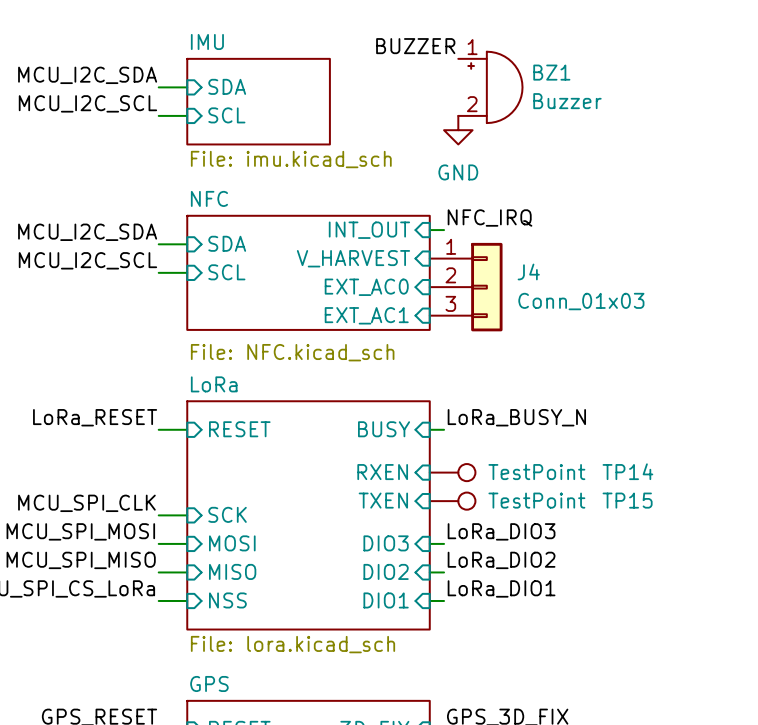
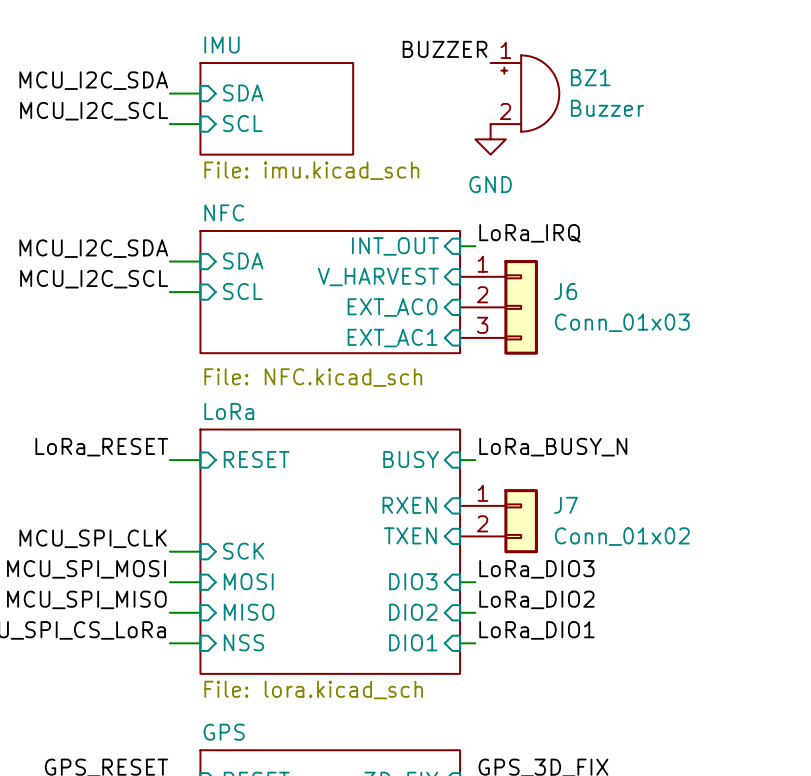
label: NFC_IRQ (490, 218) -> LoRa_IRQ (529, 233)
J4 name: J4 (528, 271) -> J6 (565, 291)
TP14: TestPoint (452, 472) -> none
J7: none -> Conn_01x02 (499, 521)
TP15: TestPoint (452, 501) -> none

